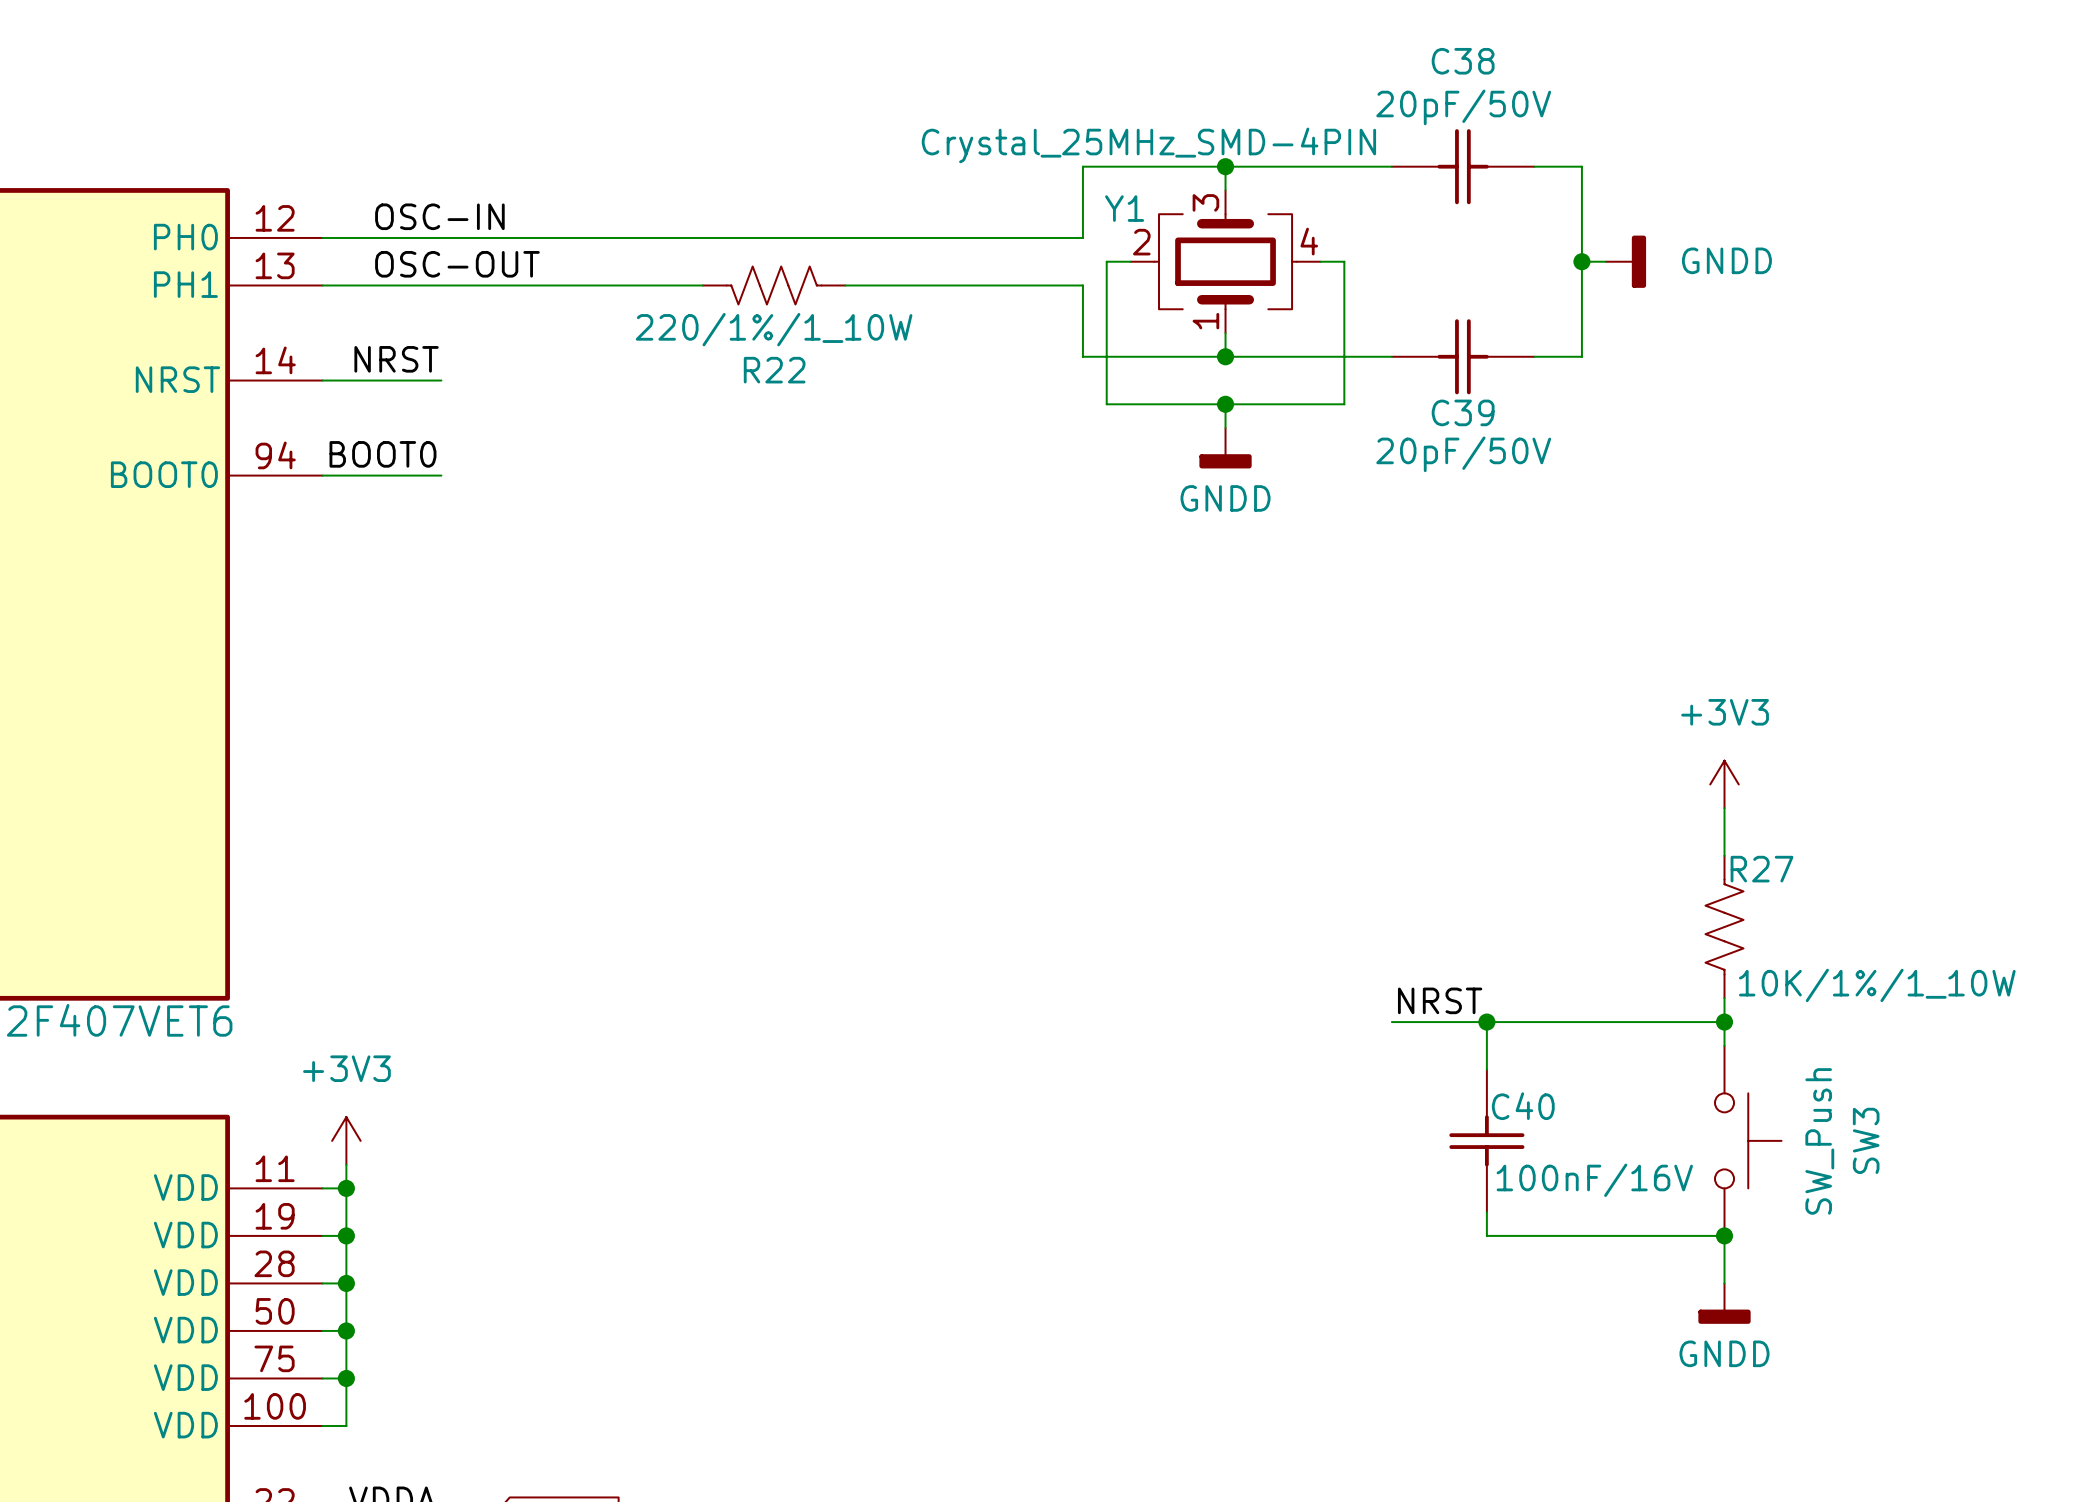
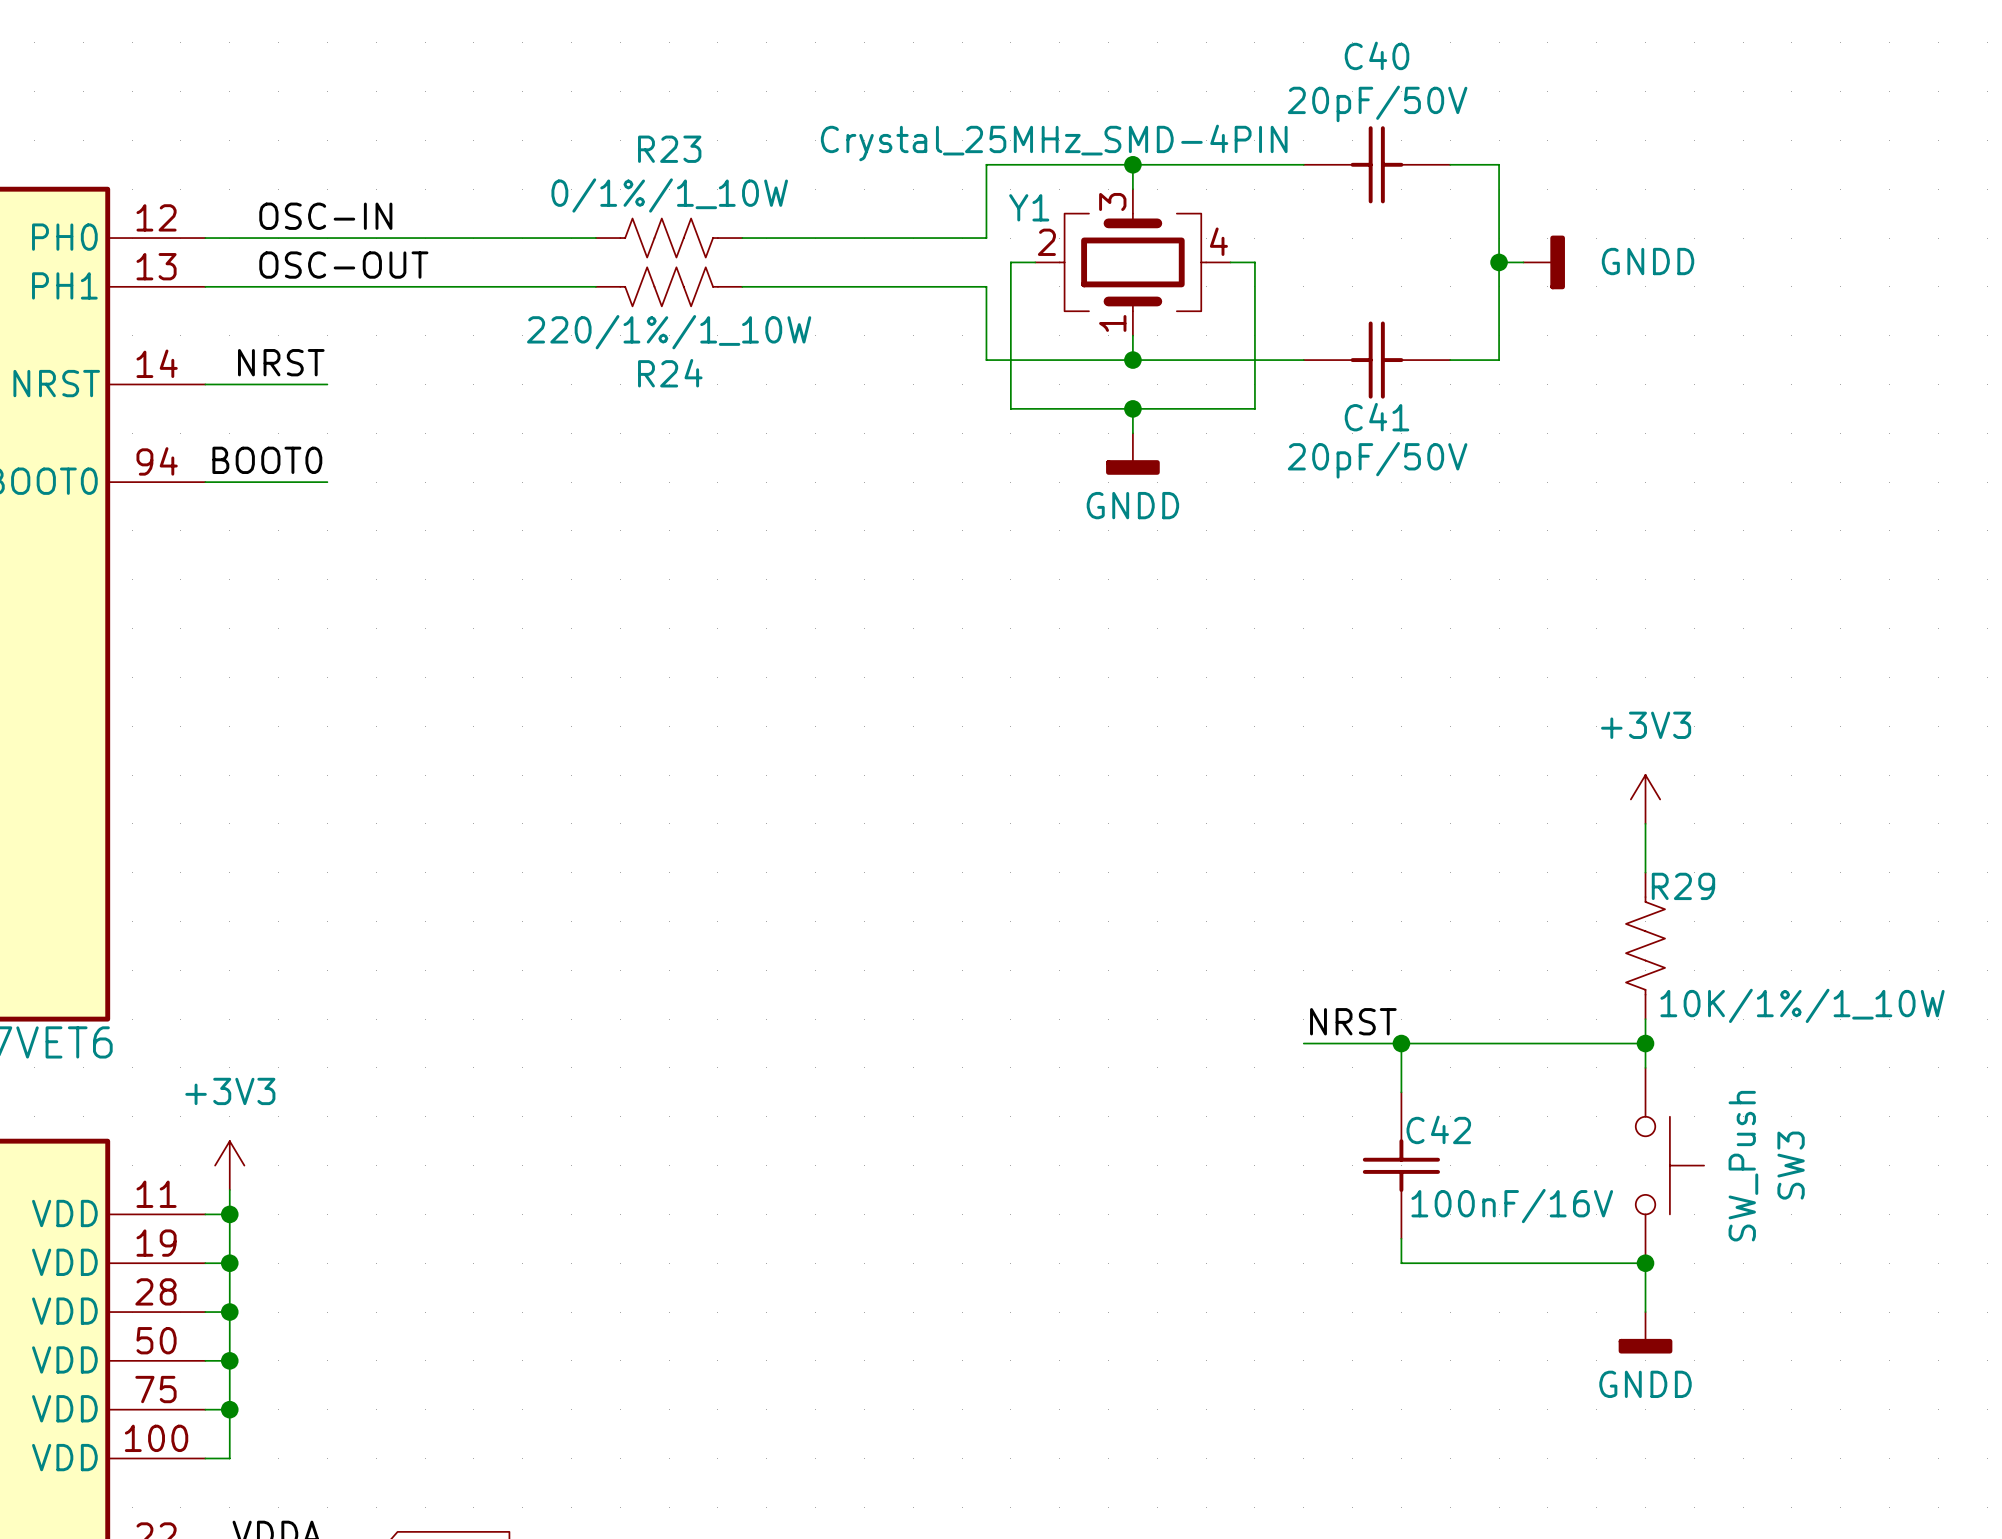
C38 name: C38 (1463, 61) -> C40 (1377, 55)
wire: (702, 237) (845, 237) -> none
R23: none -> 0/1%/1_10W (669, 238)
R22 name: R22 (774, 370) -> R24 (670, 373)
C39 name: C39 (1463, 412) -> C41 (1377, 417)
R27 name: R27 (1762, 869) -> R29 (1683, 886)
C40 name: C40 (1523, 1106) -> C42 (1438, 1129)

